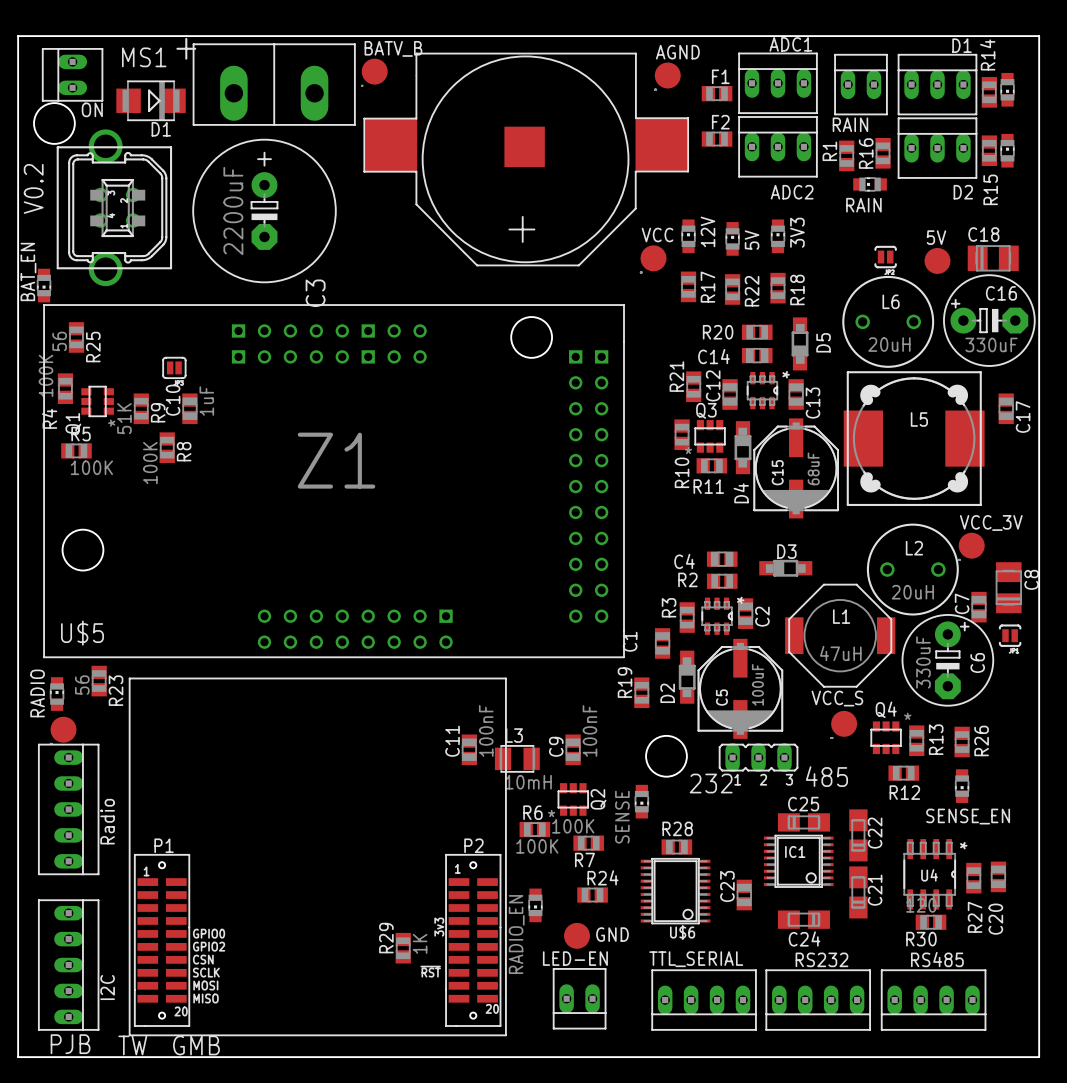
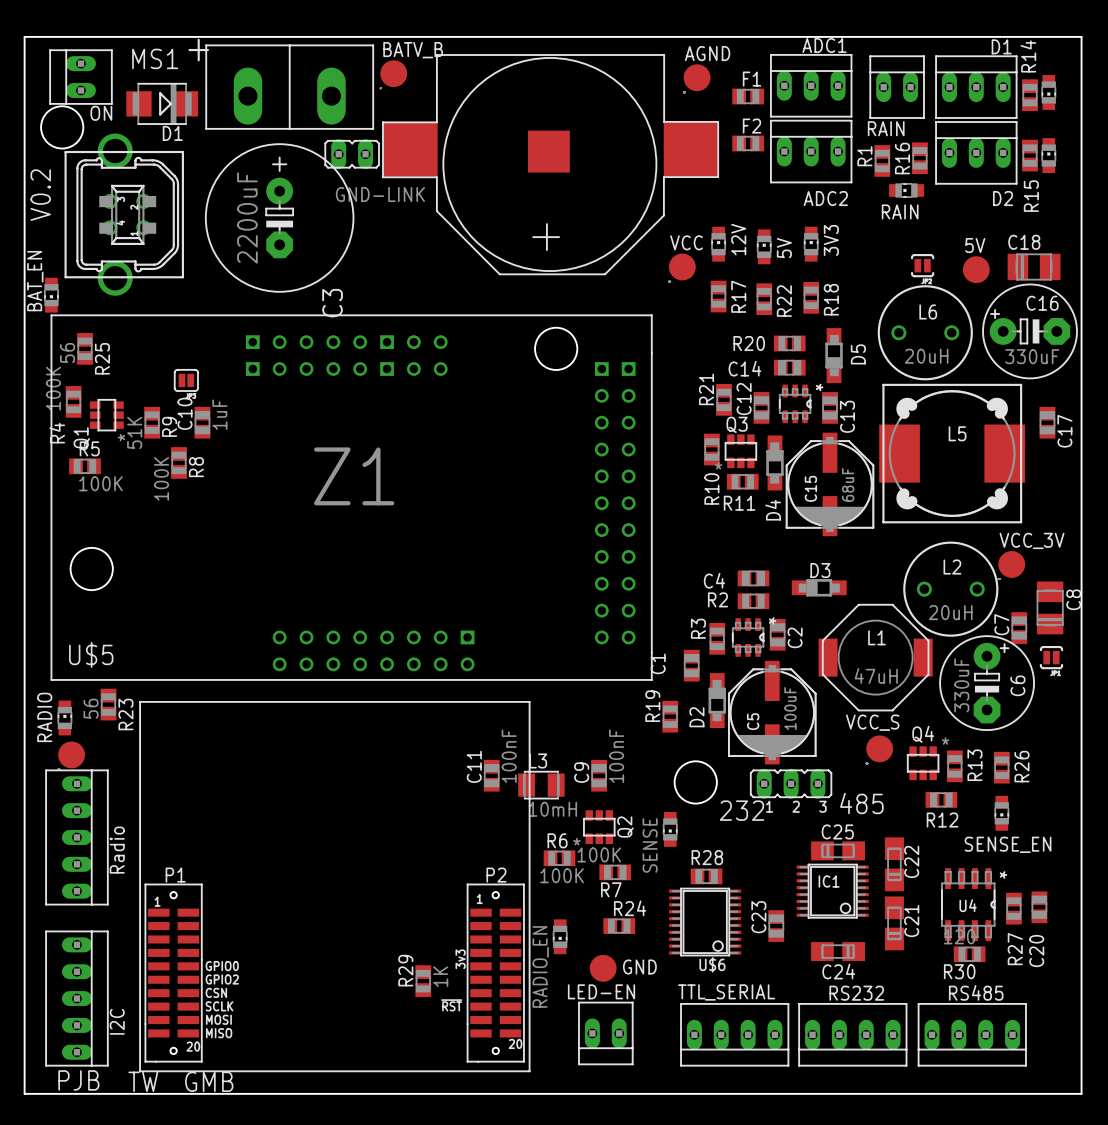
part: none -> GND-LINK (352, 154)

